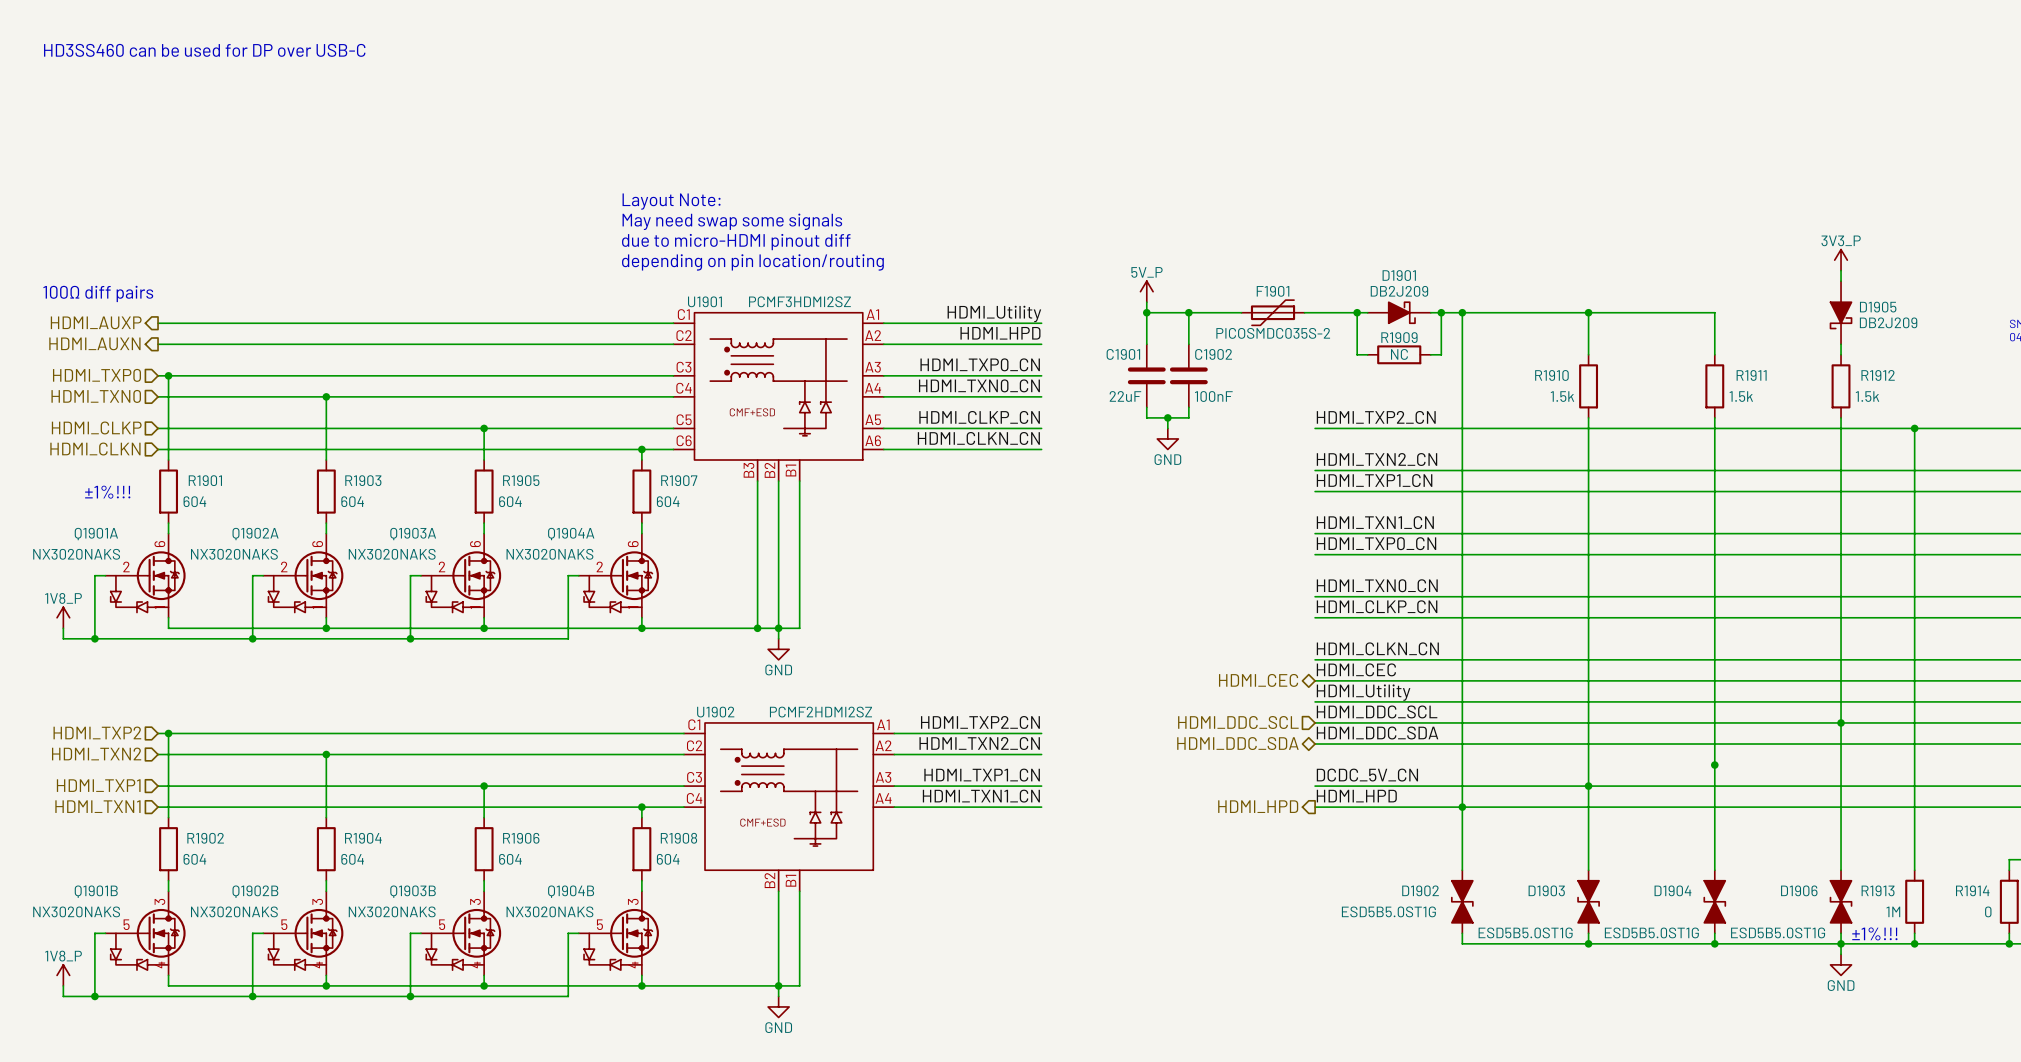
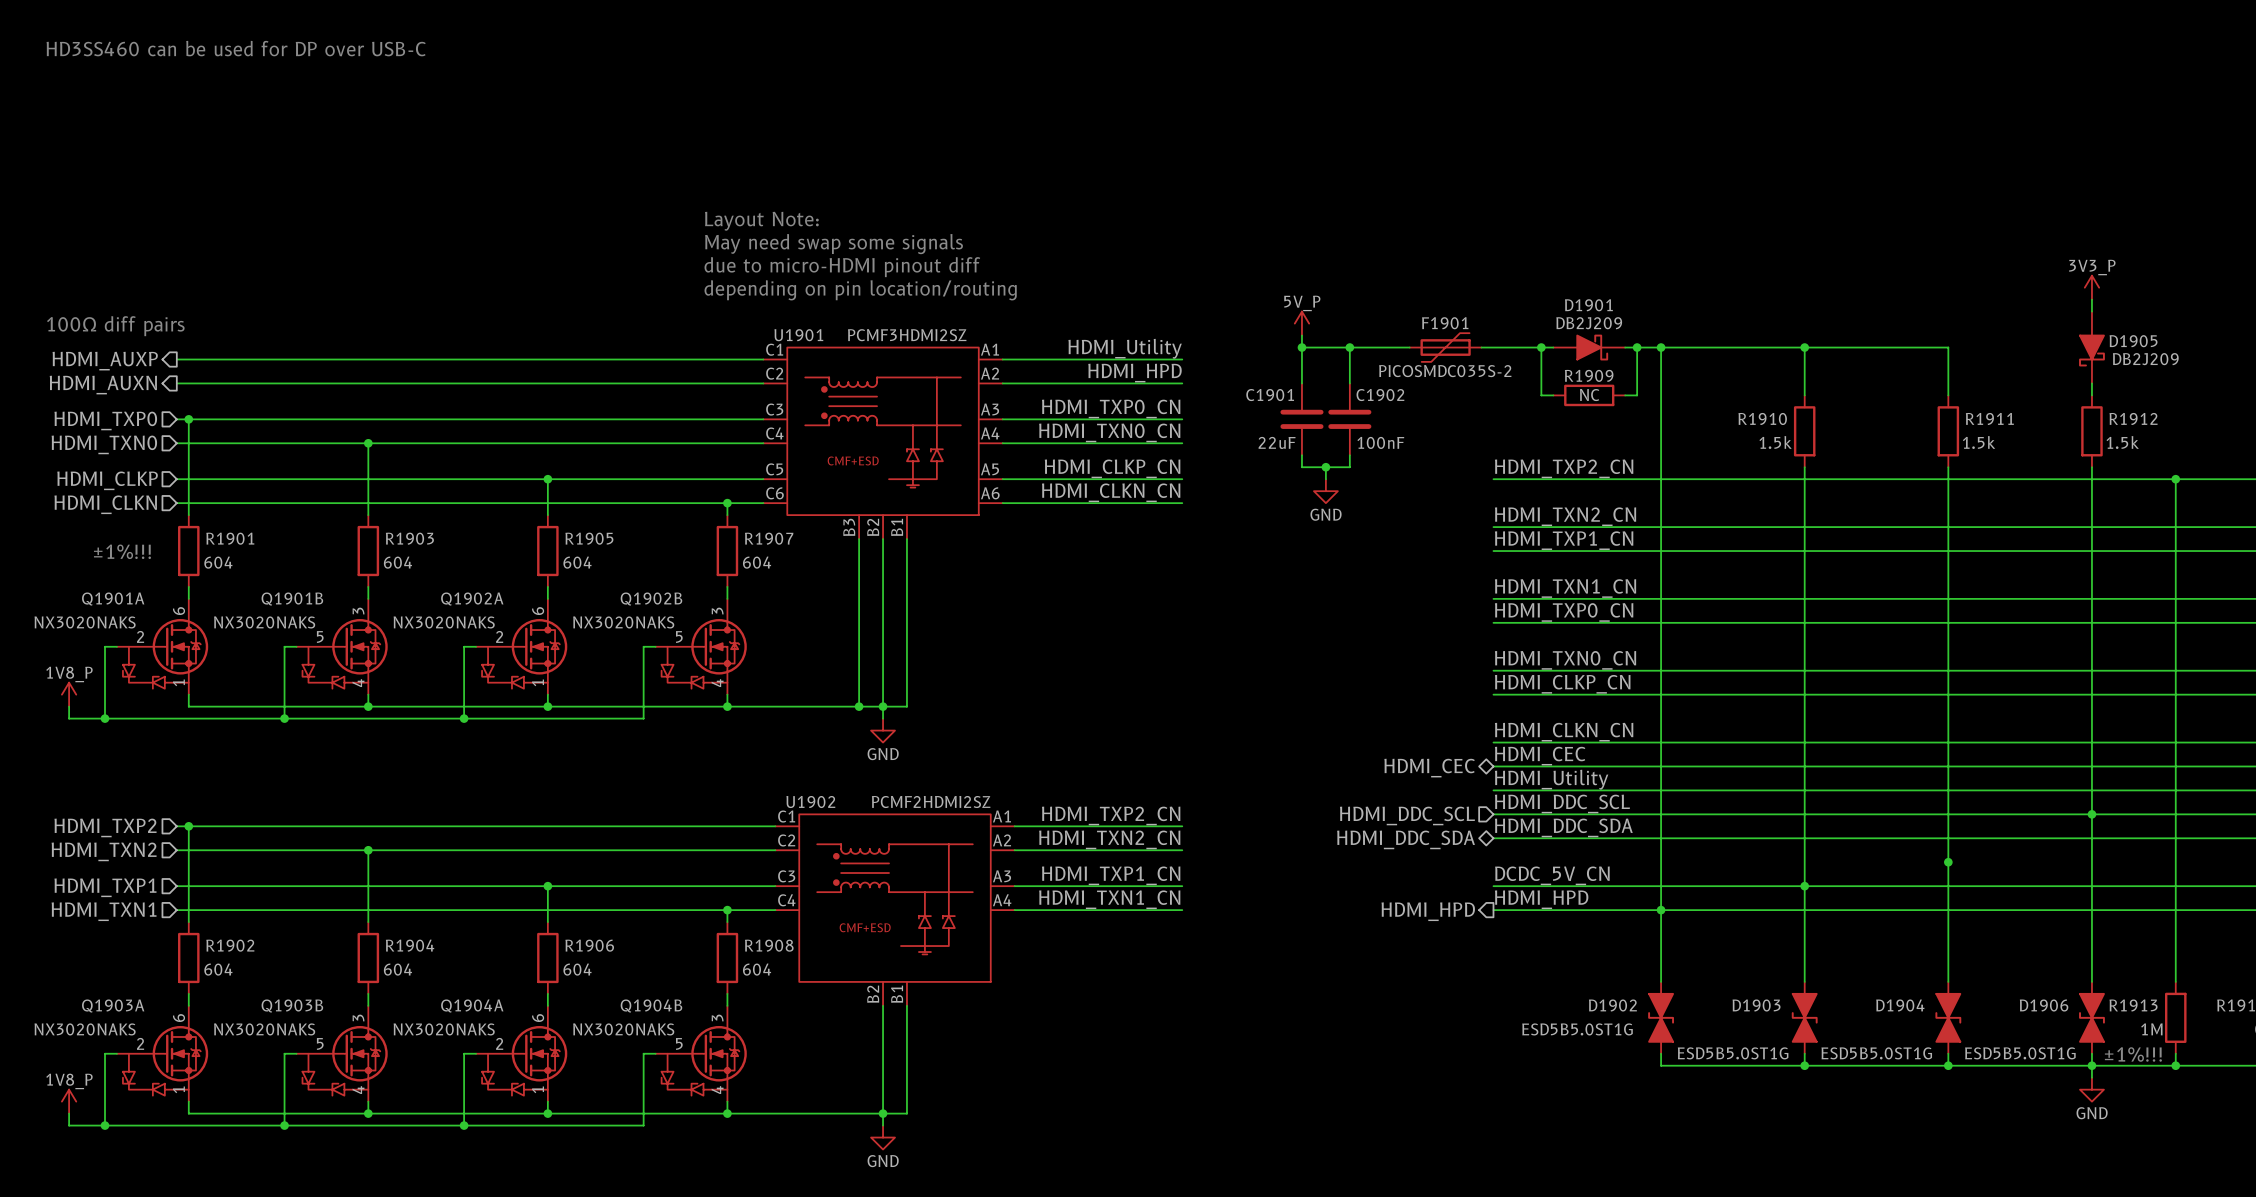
Q1903A name: Q1903A (413, 534) -> Q1902A (472, 599)
Q1902A: NX3020NAKS (303, 575) -> none
Q1904A position: (618, 575) -> (521, 1053)
Q1902B: none -> NX3020NAKS (701, 646)
Q1902B name: Q1902B (255, 891) -> Q1903B (292, 1005)
Q1901B position: (145, 933) -> (342, 646)
Q1903A: none -> NX3020NAKS (162, 1053)
Q1903B: NX3020NAKS (461, 933) -> none

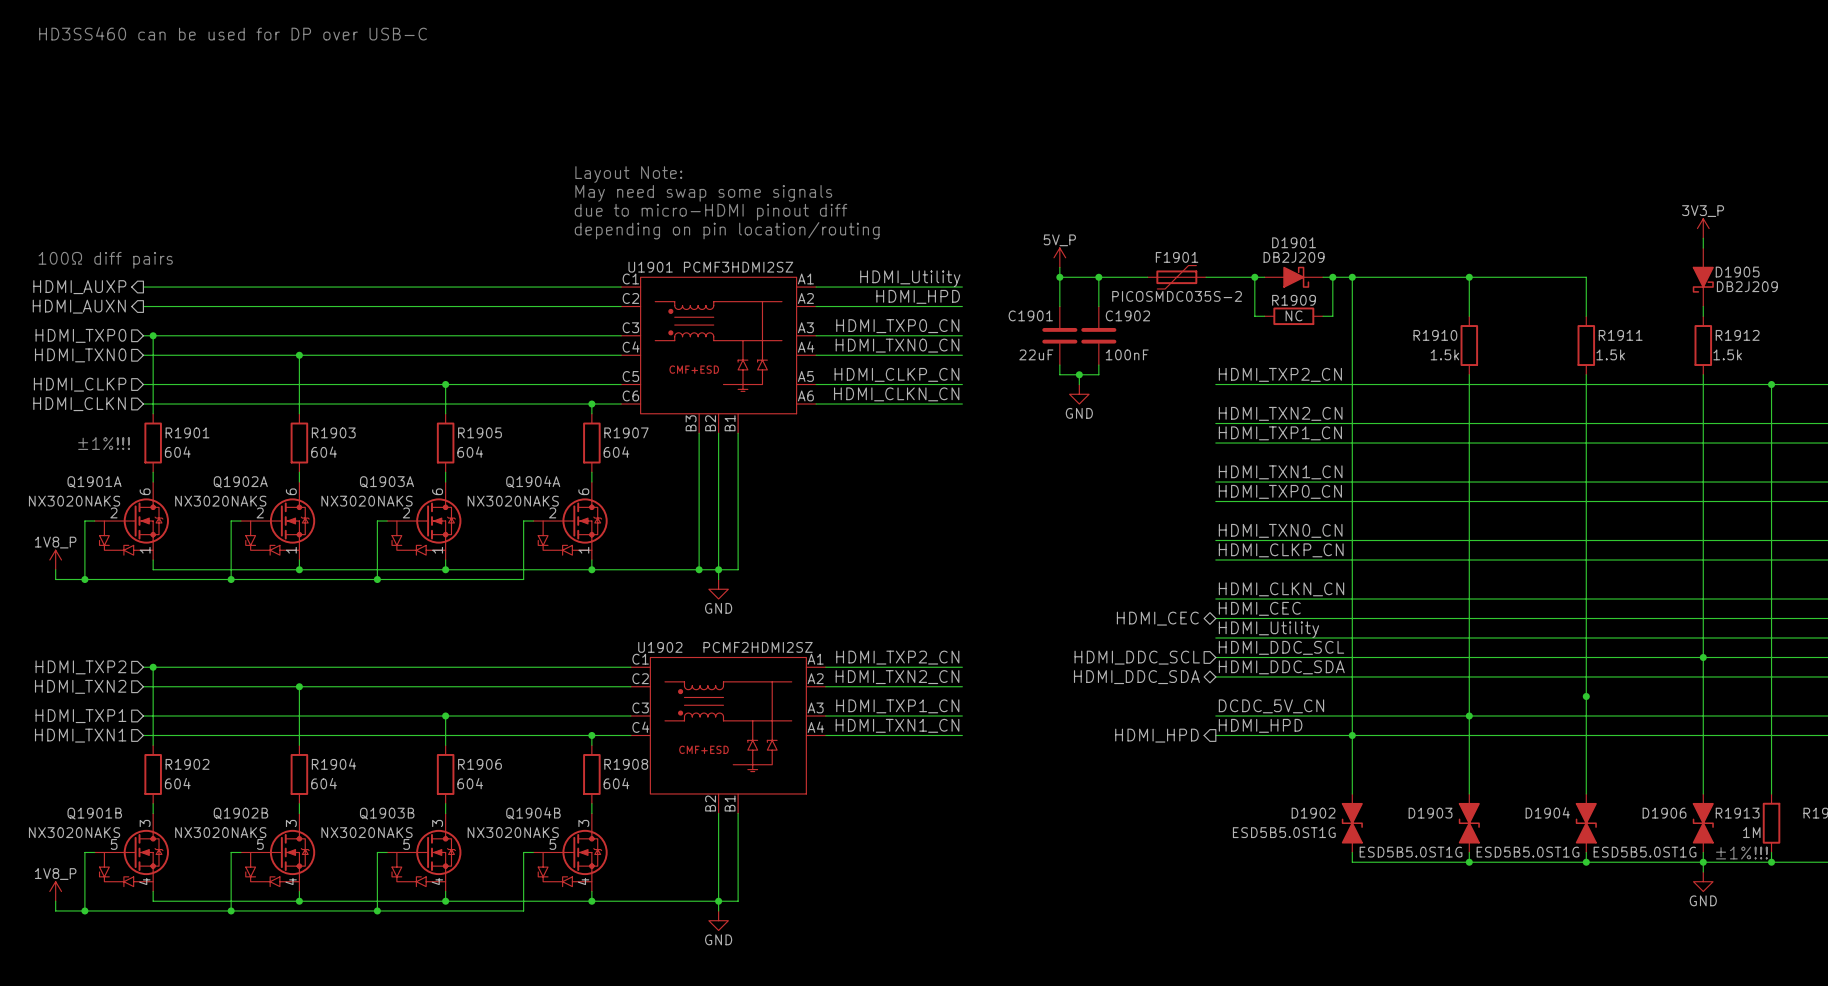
Q1902A name: Q1902A (472, 599) -> Q1903A (386, 482)
Q1901B position: (342, 646) -> (131, 852)
Q1902A: none -> NX3020NAKS (278, 521)
Q1902B: NX3020NAKS (701, 646) -> none
Q1903B name: Q1903B (292, 1005) -> Q1902B (240, 813)
Q1903A: NX3020NAKS (162, 1053) -> none
Q1904A position: (521, 1053) -> (570, 521)
Q1903B: none -> NX3020NAKS (424, 852)

